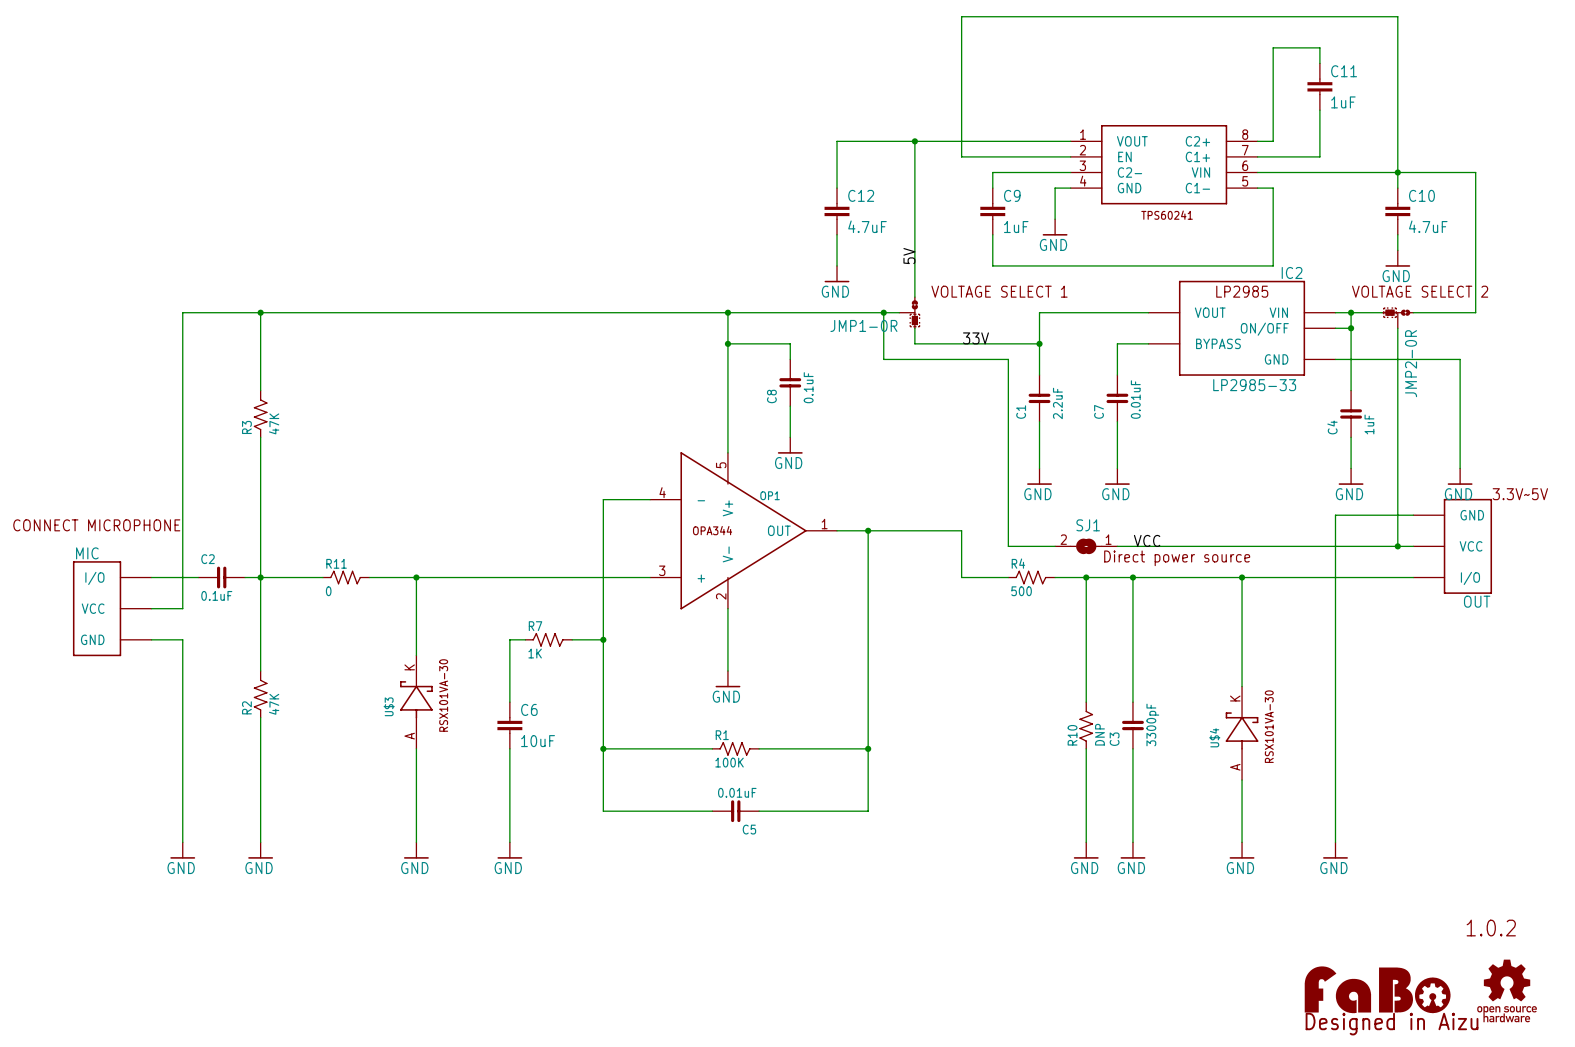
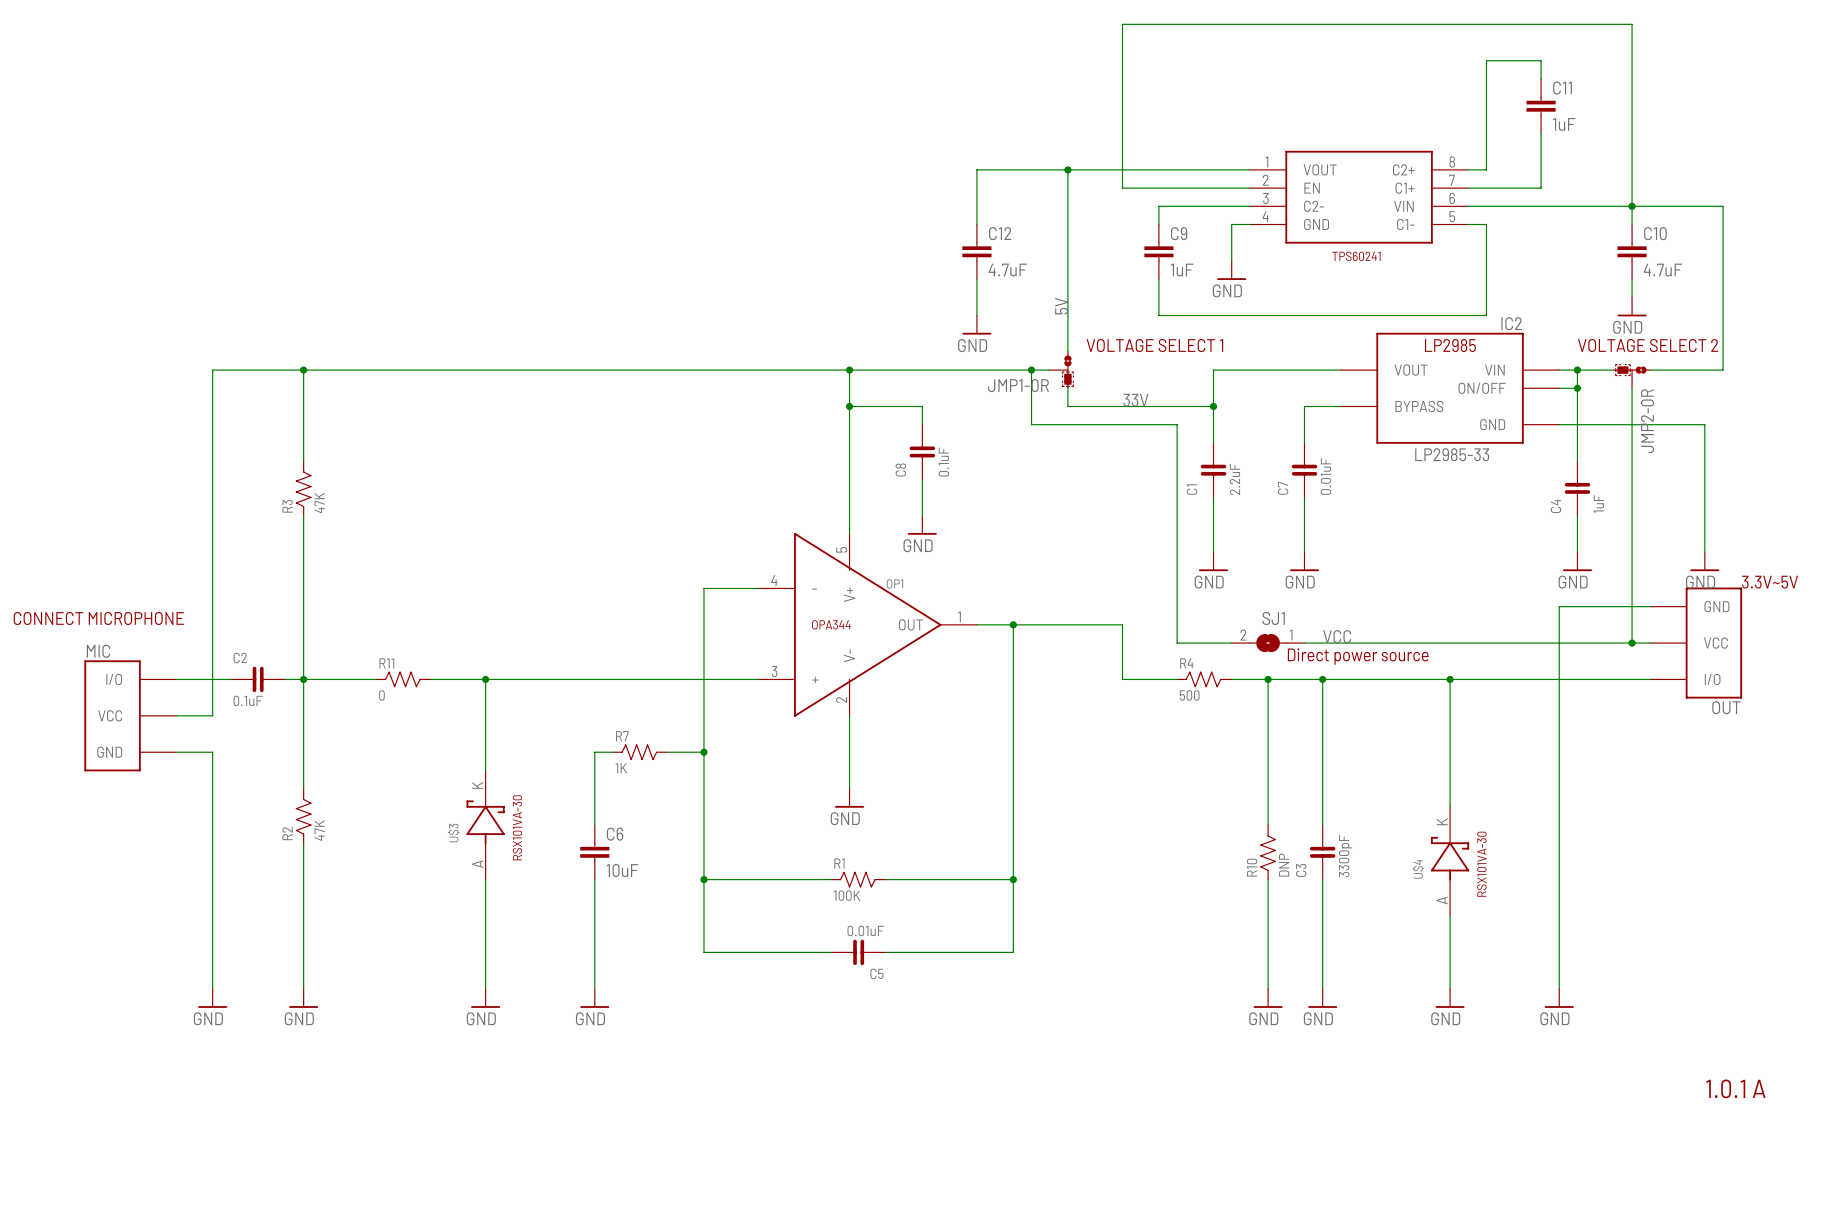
text: 1.0.2 (1491, 928) -> 1.0.1 A (1735, 1088)
part: (1377, 989) -> none
part: (1507, 990) -> none

